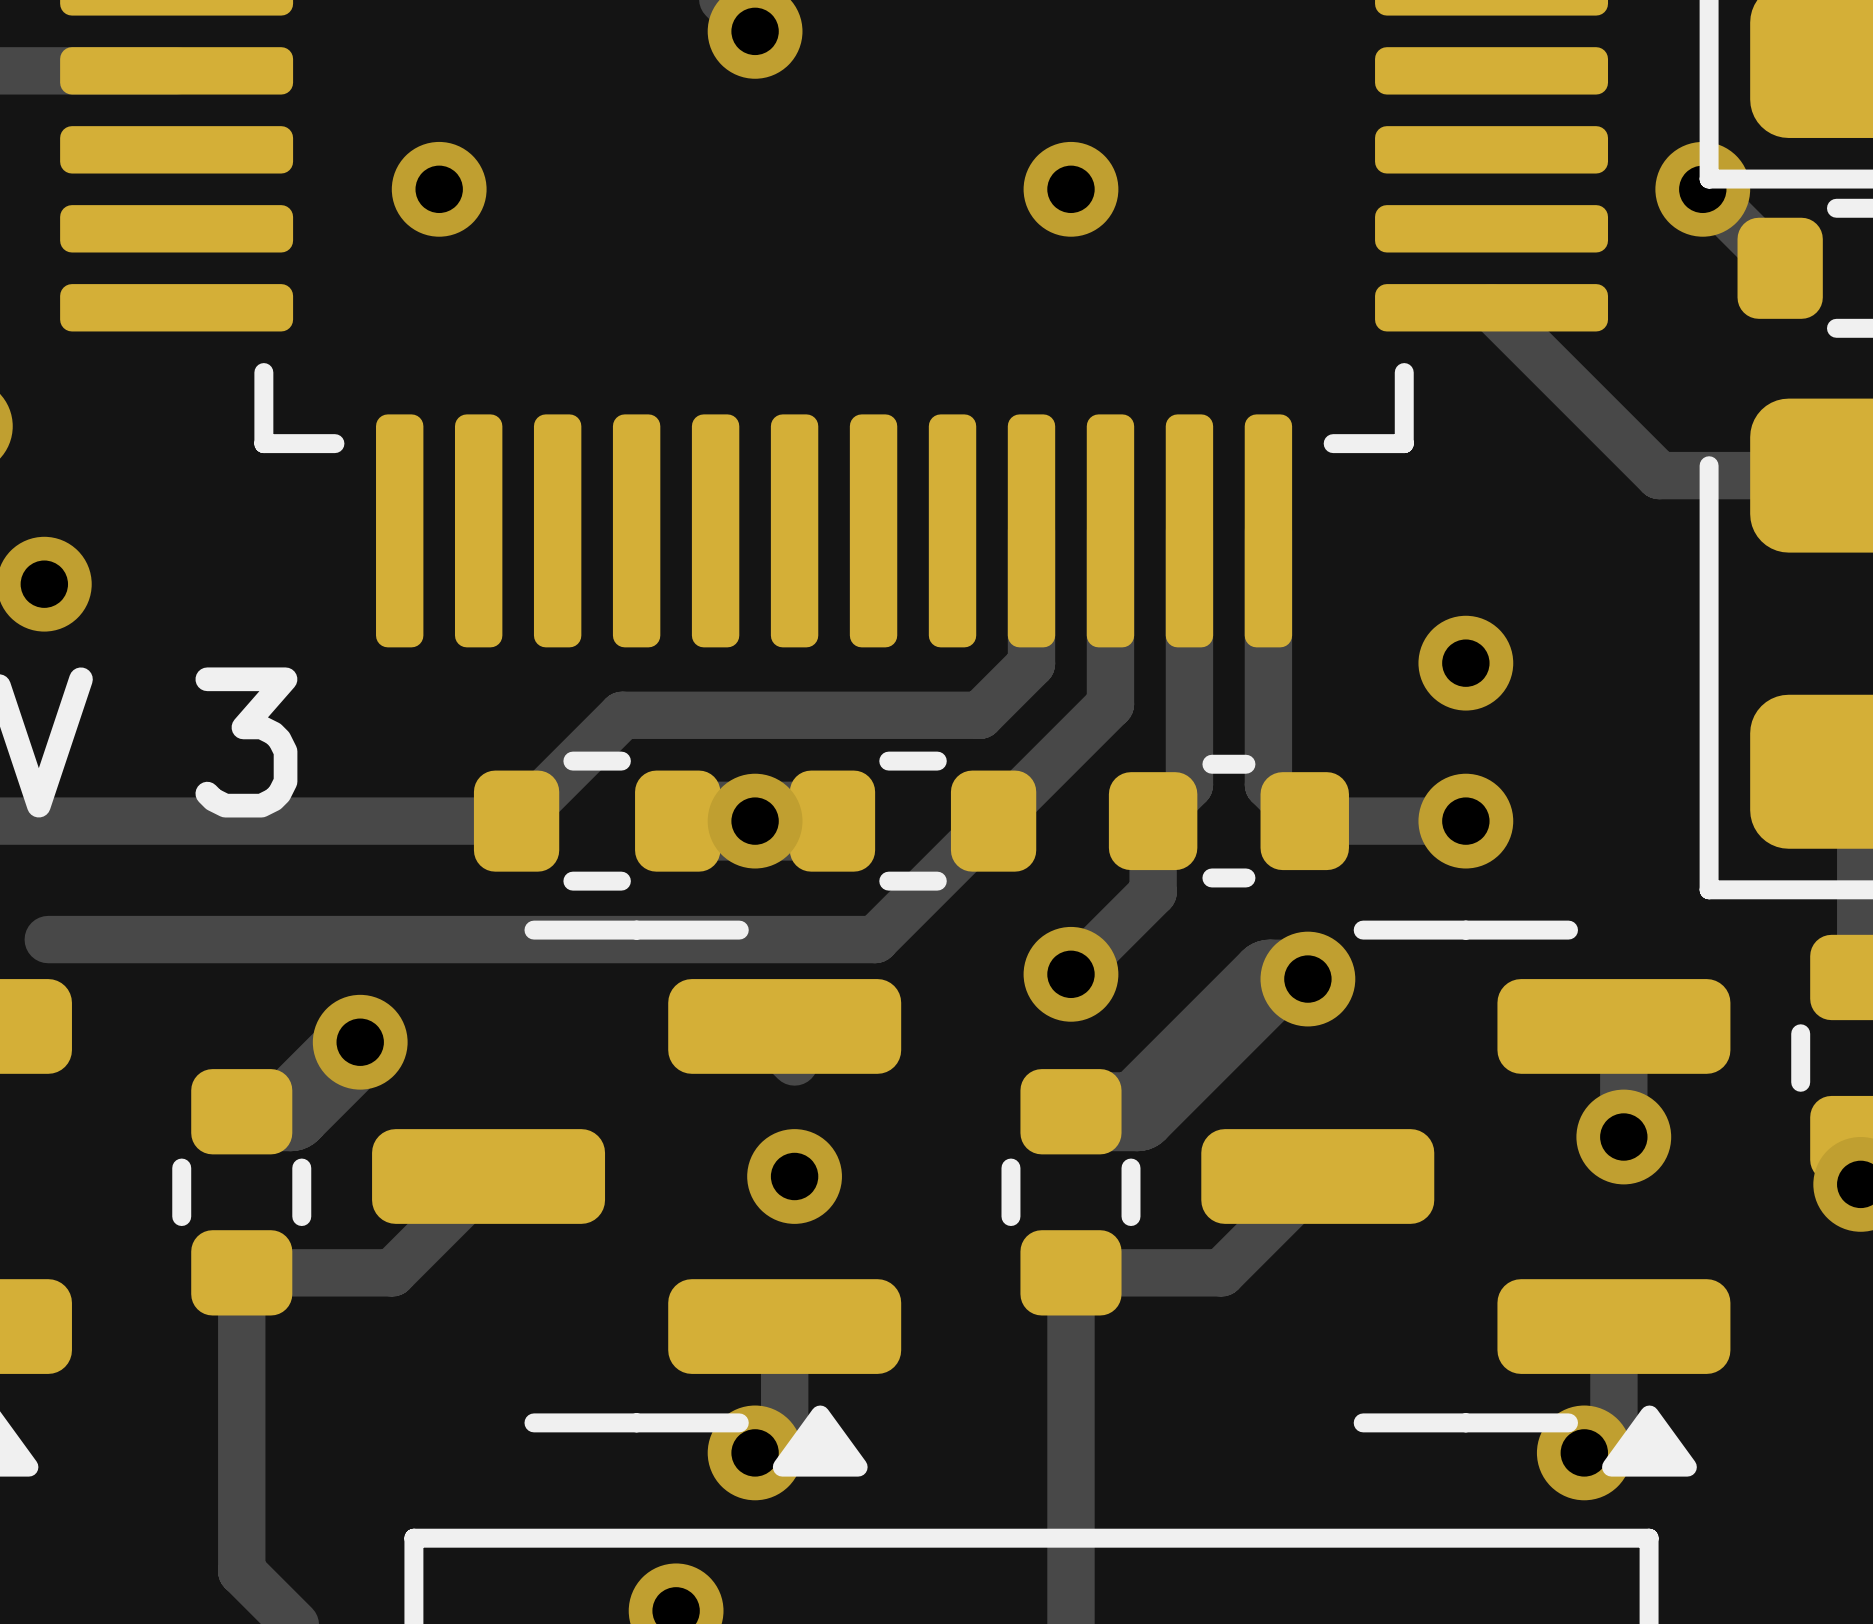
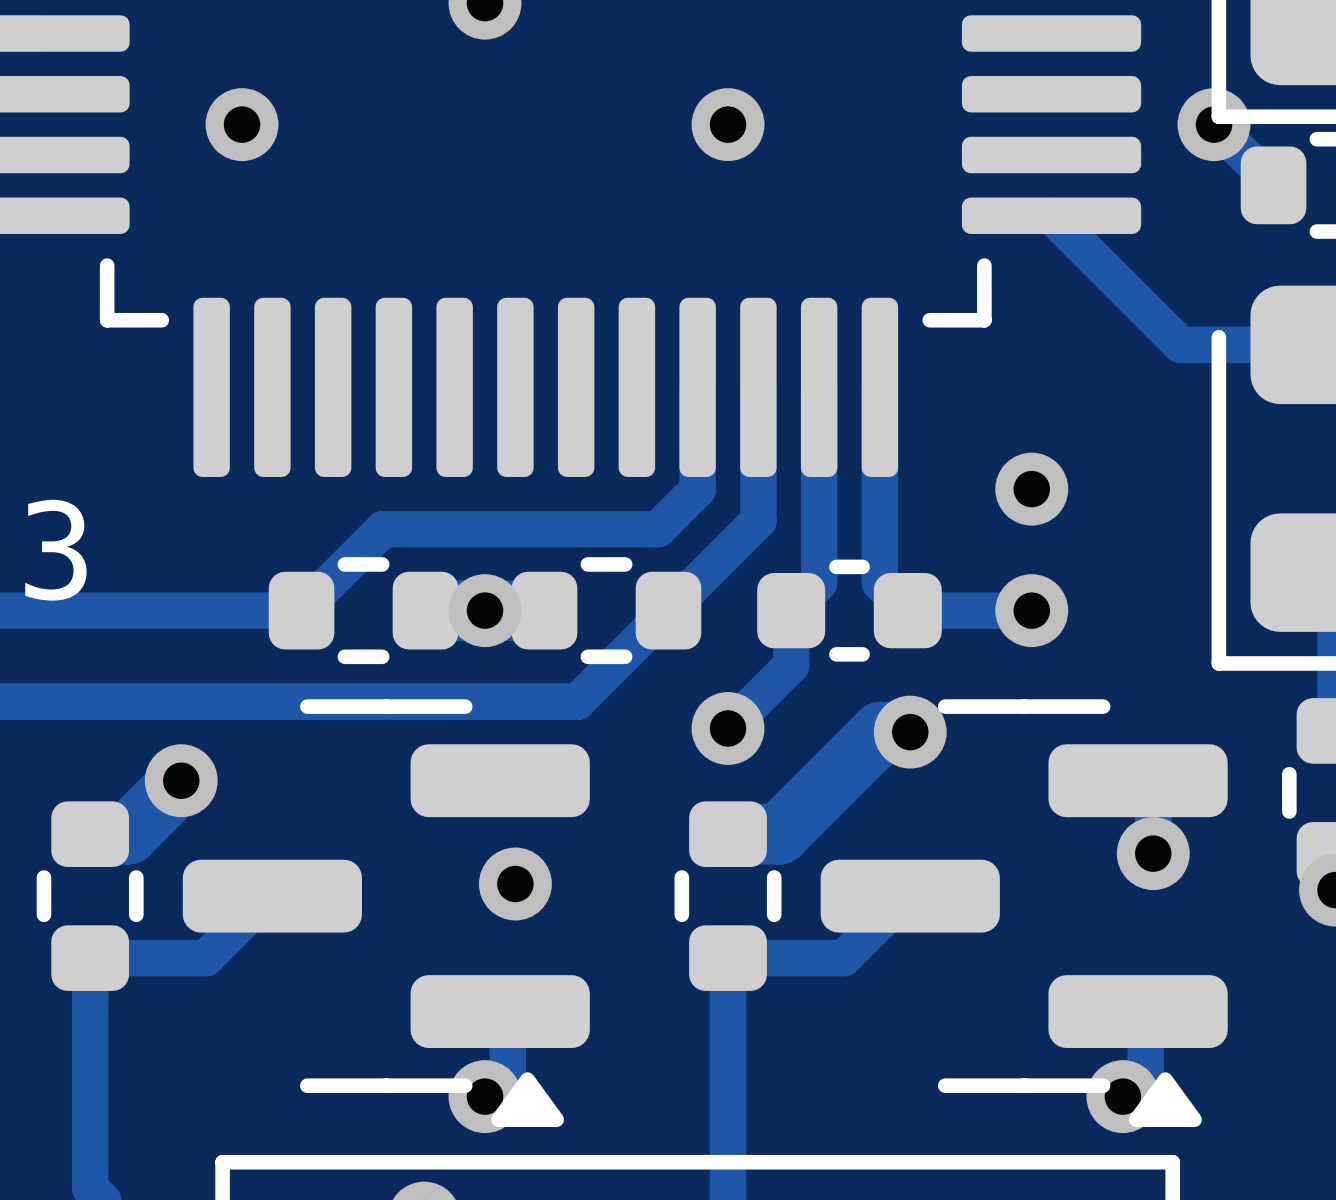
part position: (636, 1198) -> (386, 913)
part position: (1465, 1198) -> (1024, 913)

